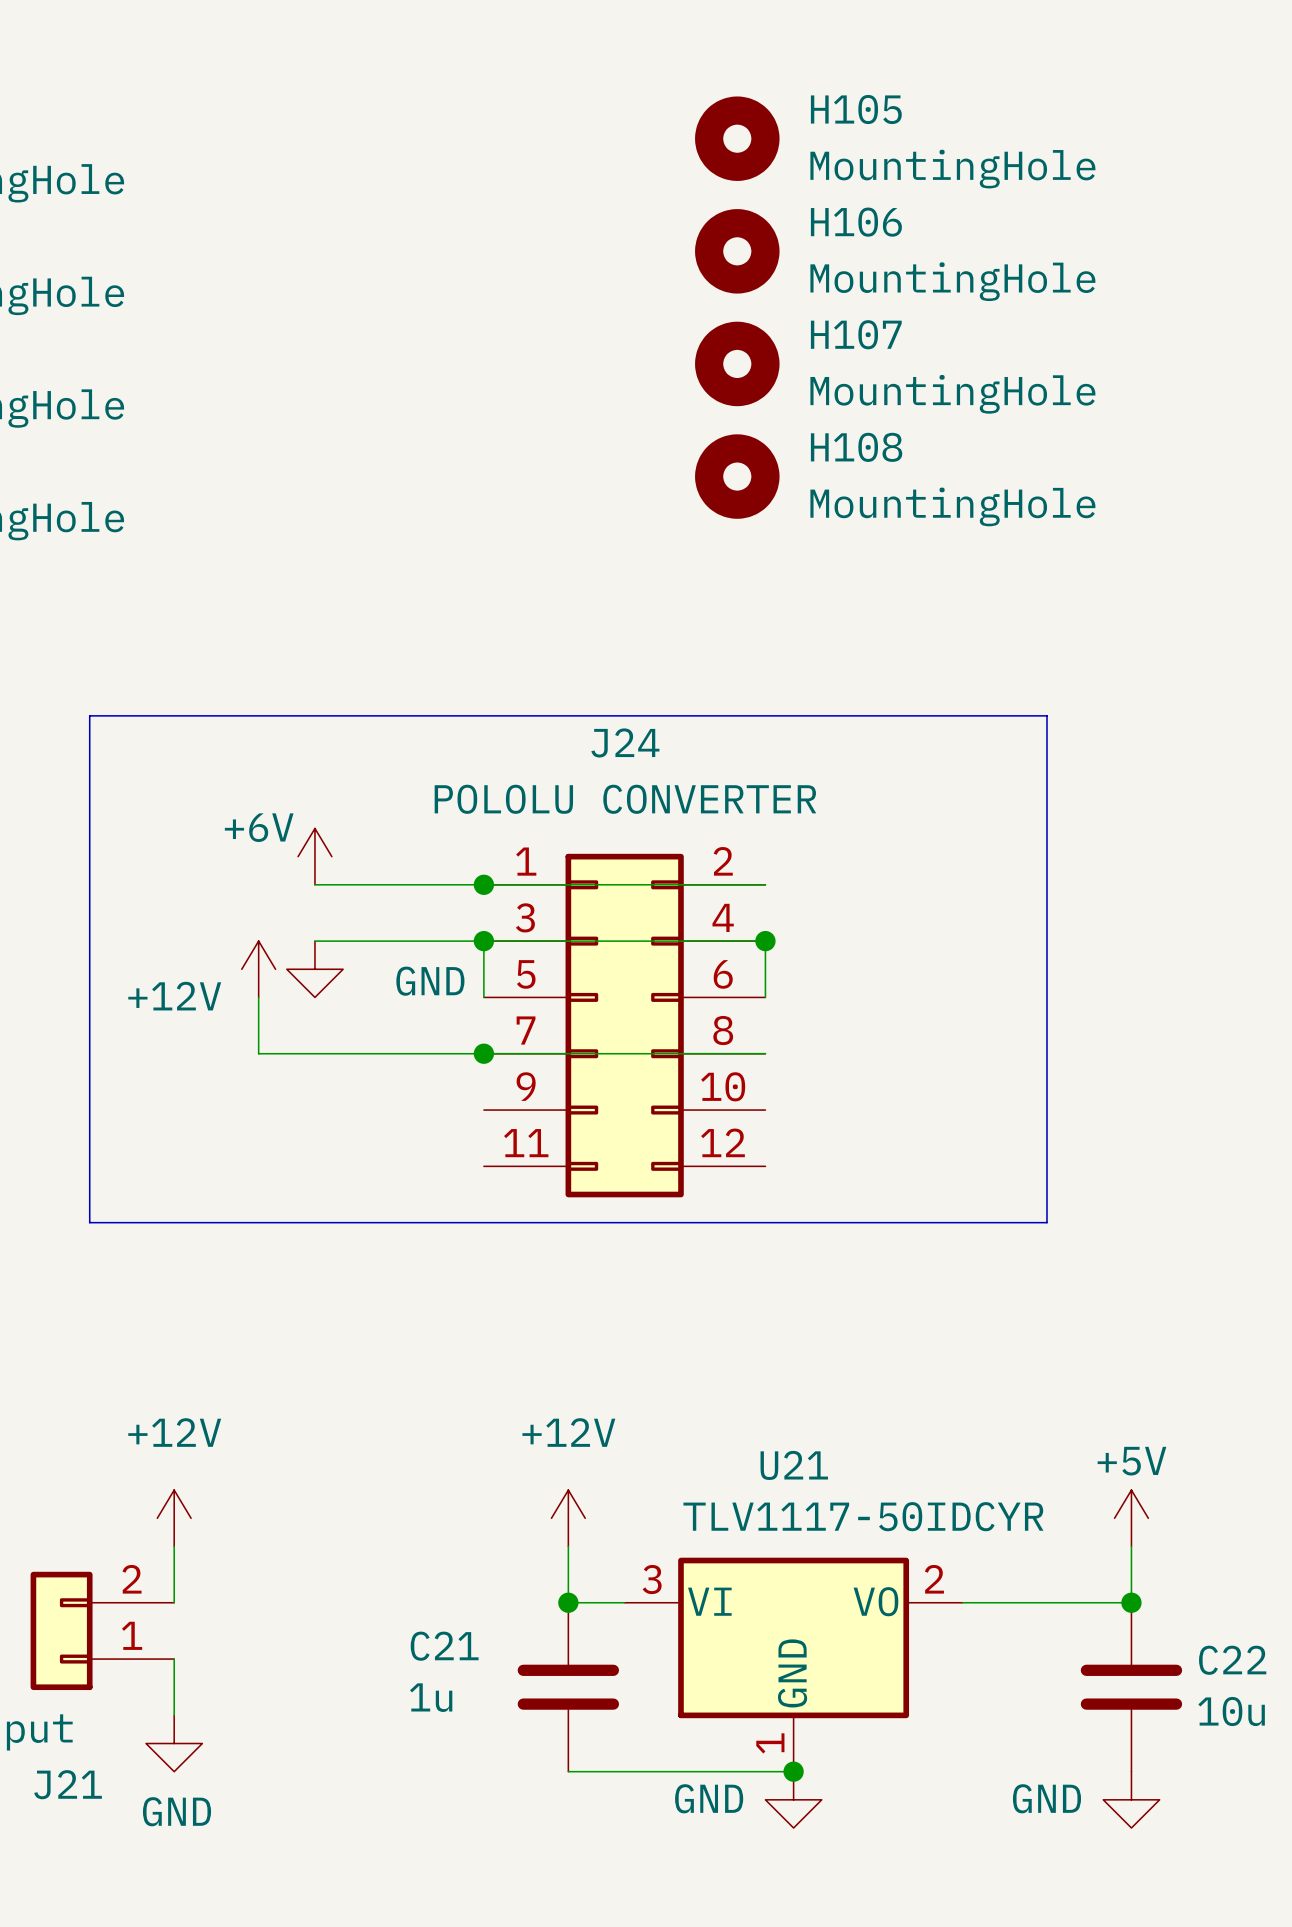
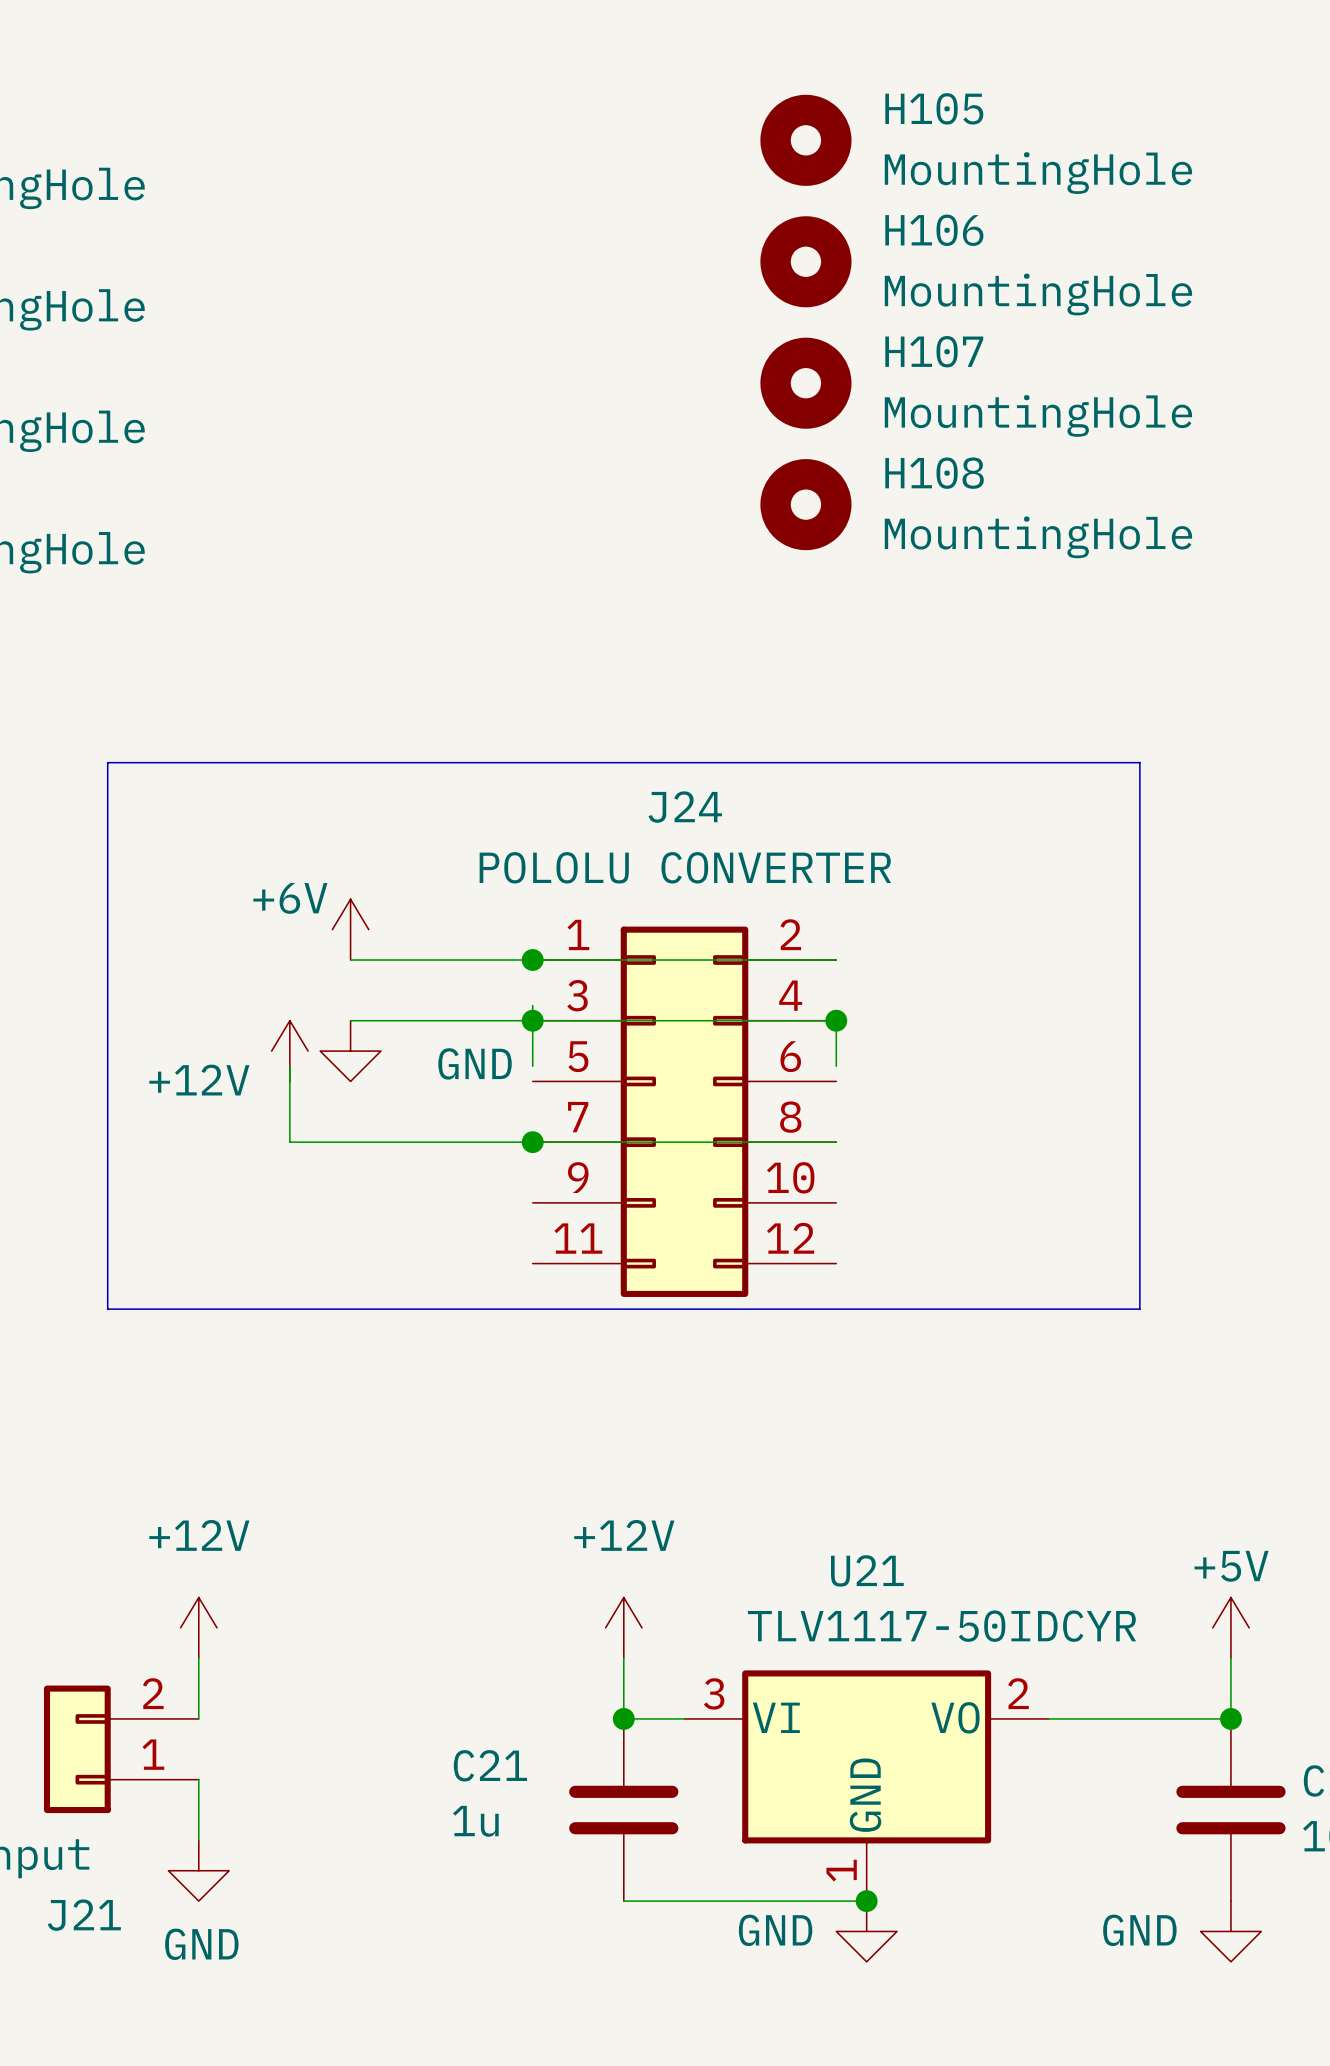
power symbol position: +6V (314, 856) -> +6V (350, 929)
wire: (314, 884) (765, 884) -> (350, 960) (836, 960)
junction position: (483, 884) -> (532, 960)
wire: (314, 941) (765, 941) (765, 955) -> (350, 1020) (836, 1020)
junction position: (483, 941) -> (532, 1020)
junction position: (765, 941) -> (836, 1020)
power symbol position: +12V (258, 969) -> +12V (289, 1051)
power symbol position: GND (314, 969) -> GND (350, 1051)
J24 position: (624, 1025) -> (684, 1111)
wire: (258, 1053) (765, 1053) -> (289, 1126) (289, 1142) (836, 1142)
junction position: (483, 1053) -> (532, 1142)

